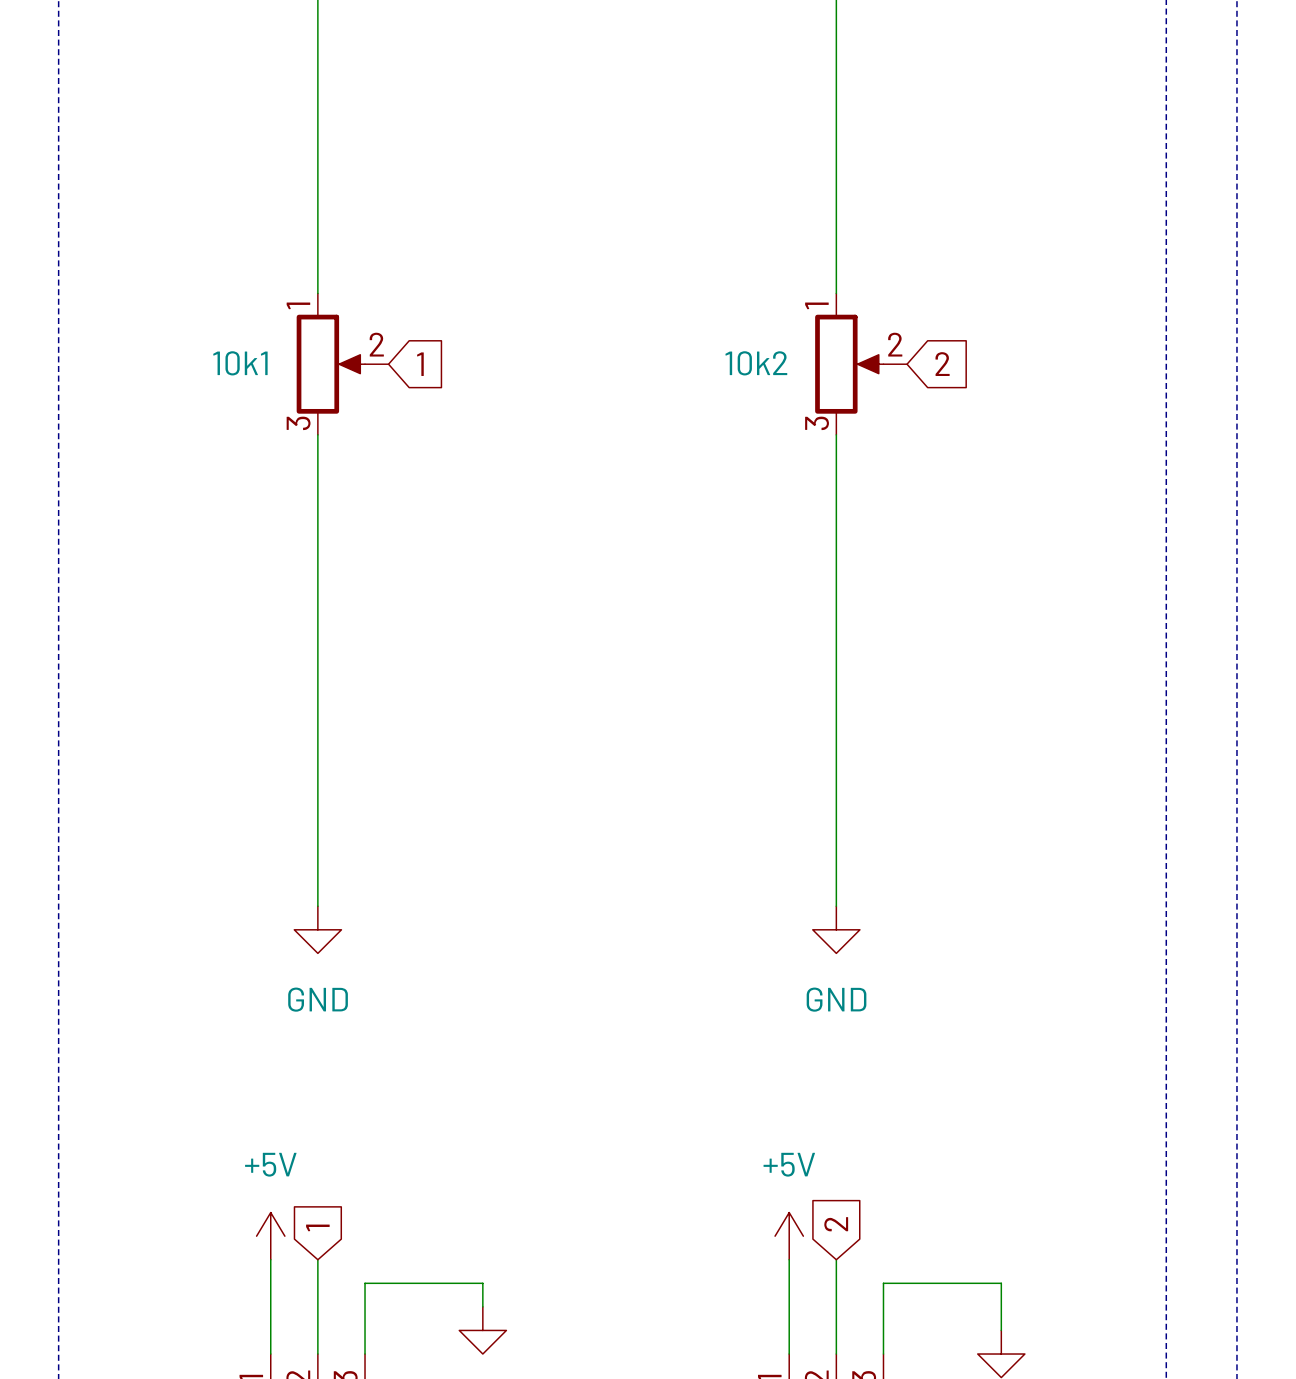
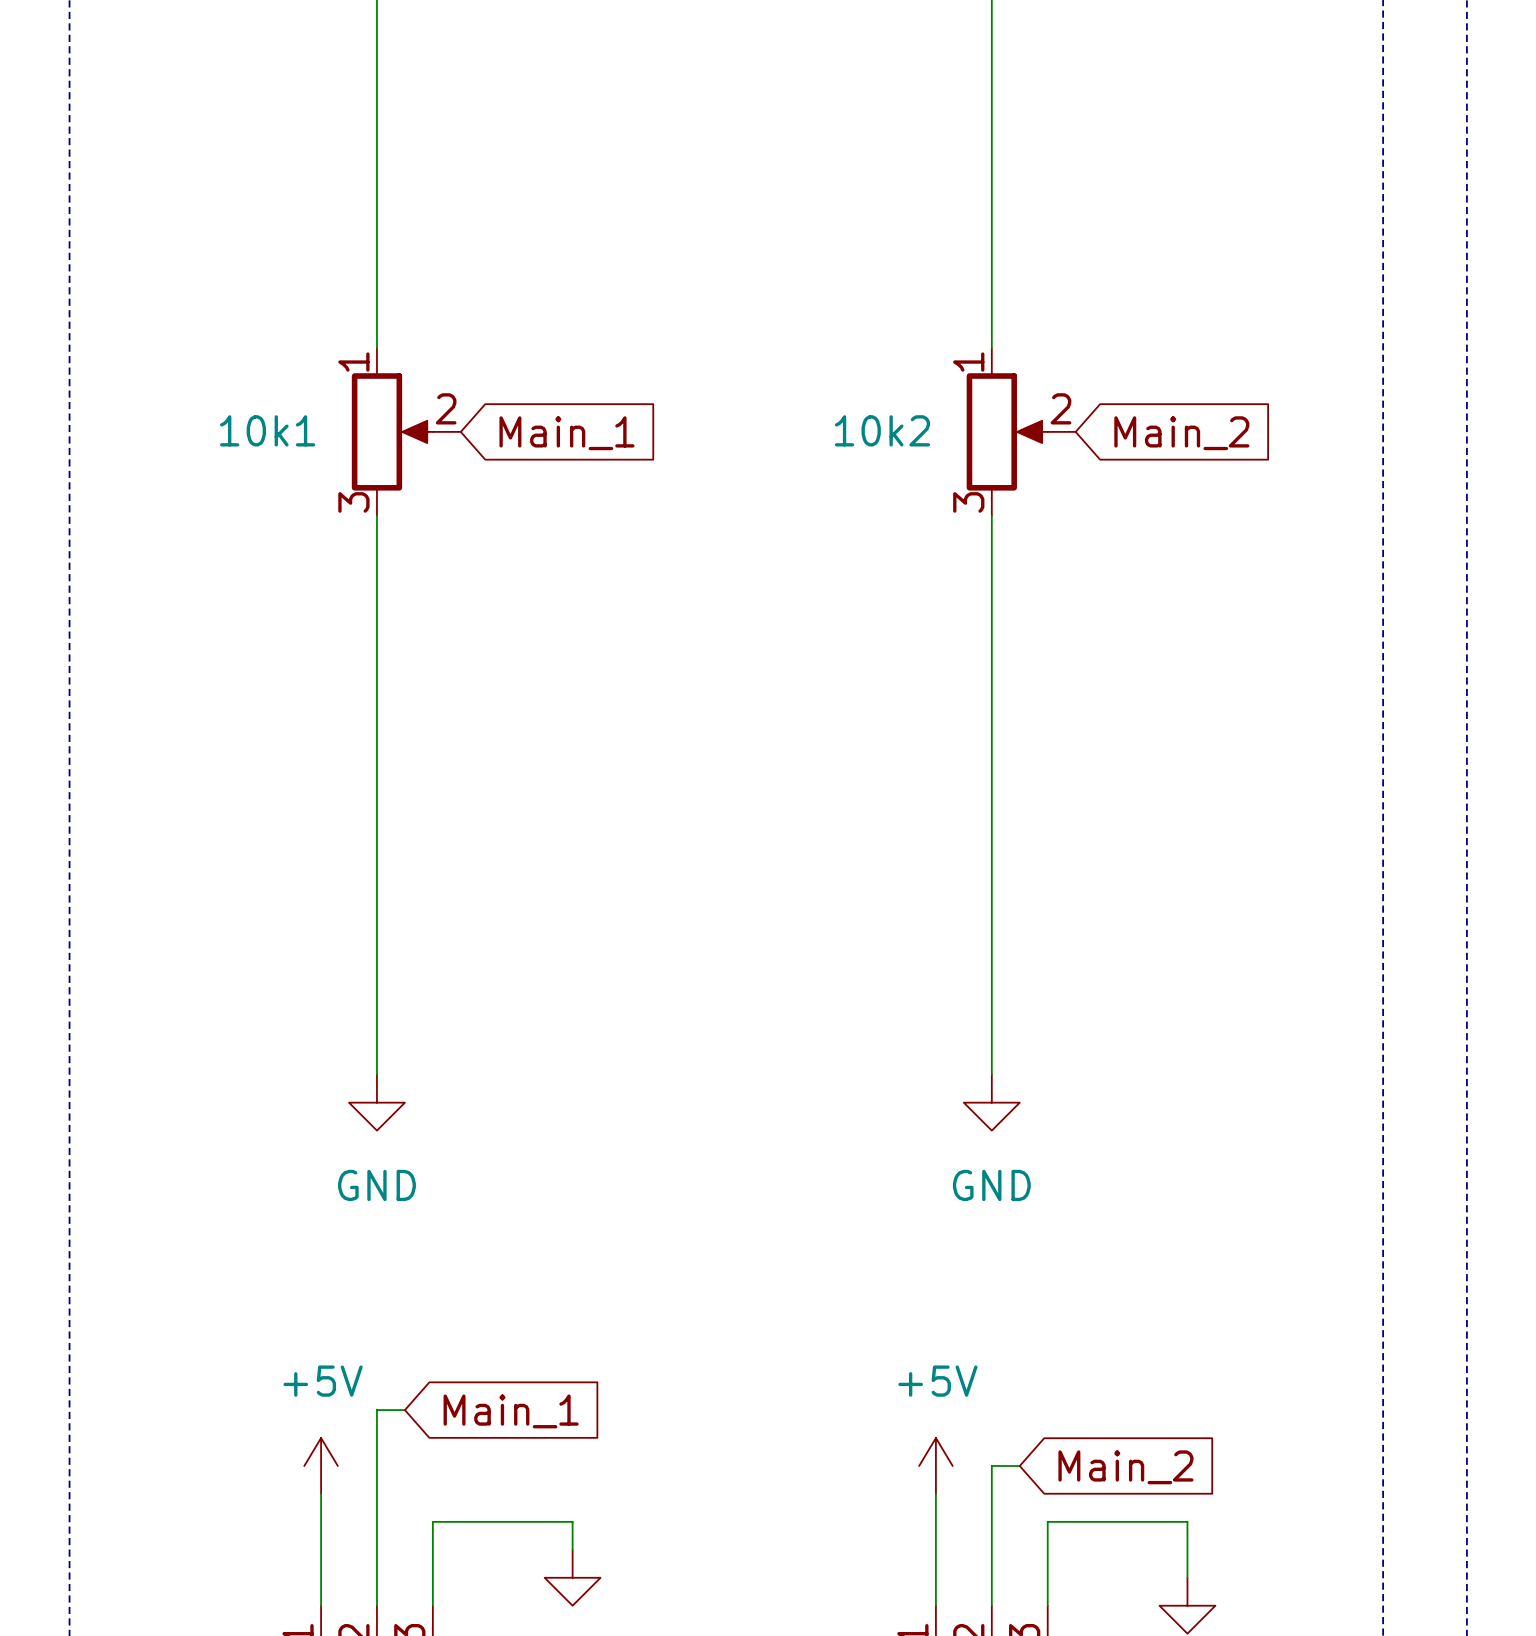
global label: 1 (420, 364) -> Main_1 (566, 433)
global label: 2 (942, 364) -> Main_2 (1181, 433)
wire: none -> (404, 1410) (376, 1410) (376, 1493)
global label: none -> Main_1 (511, 1411)
global label: 2 (836, 1224) -> none
global label: 1 (317, 1227) -> none
wire: none -> (1019, 1465) (991, 1465) (991, 1493)
global label: none -> Main_2 (1125, 1467)

